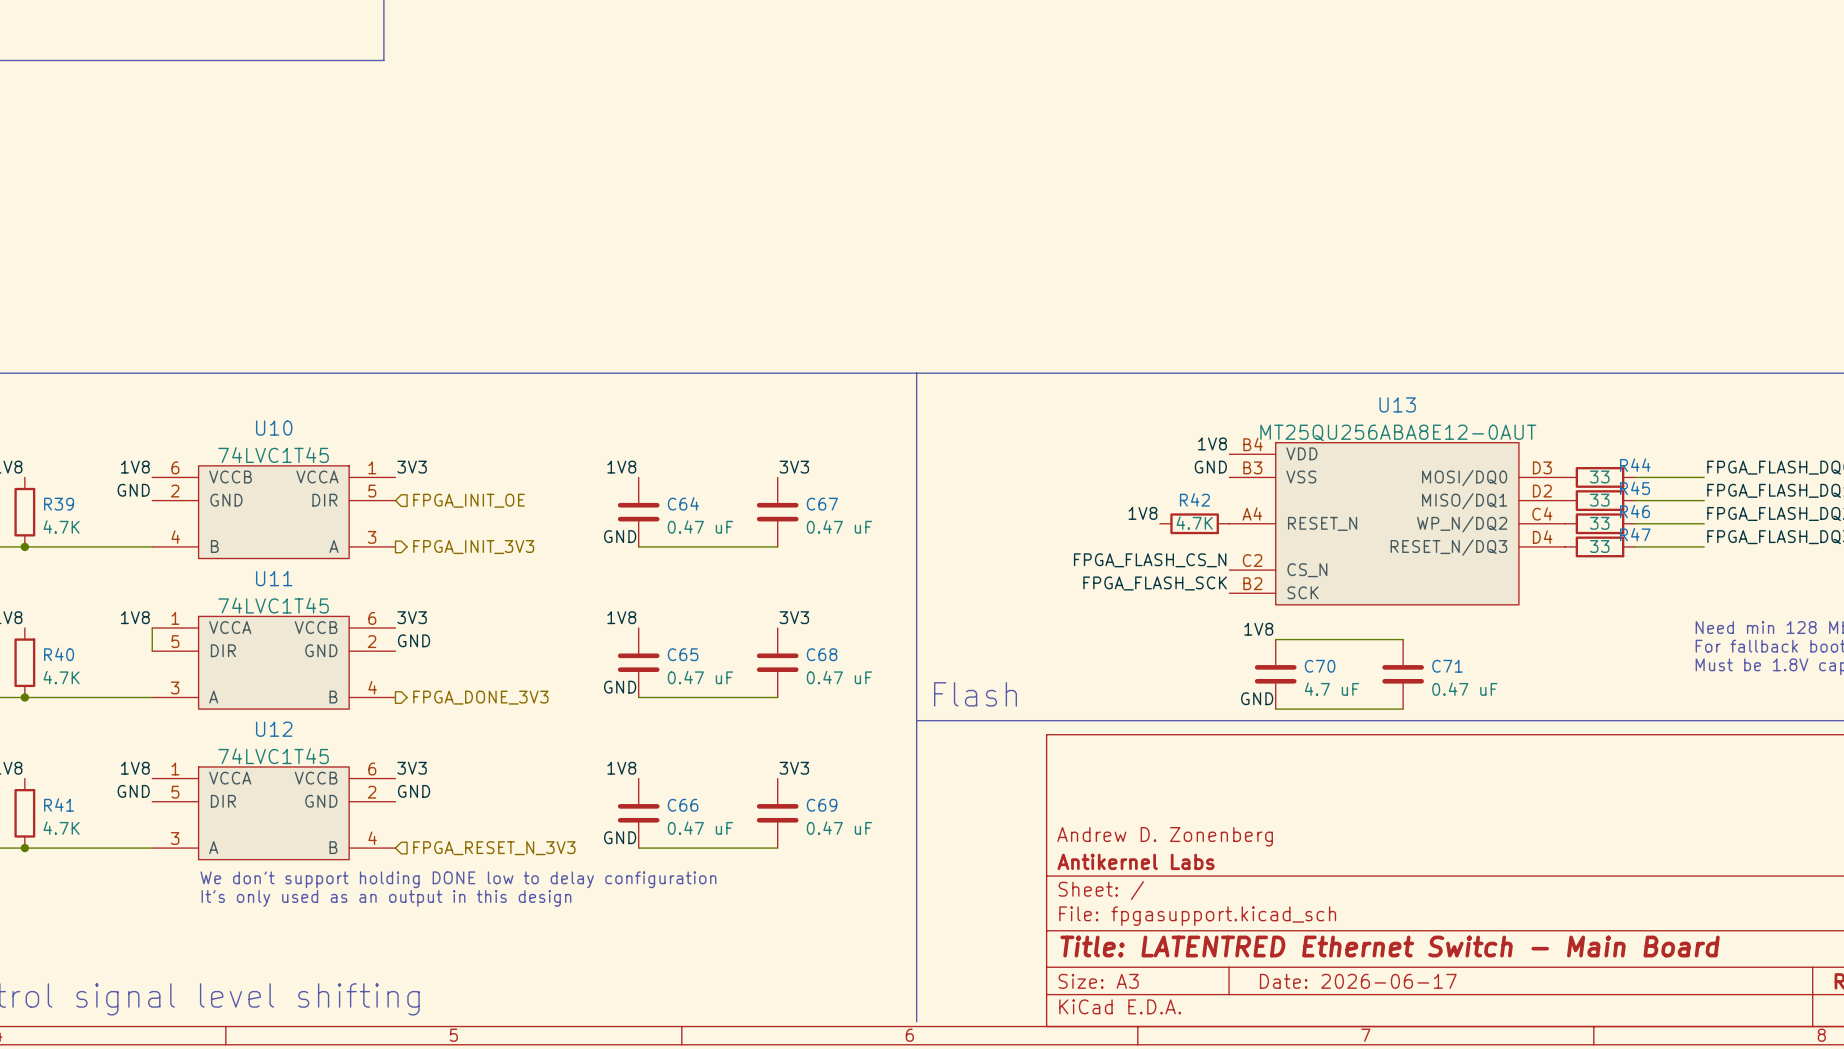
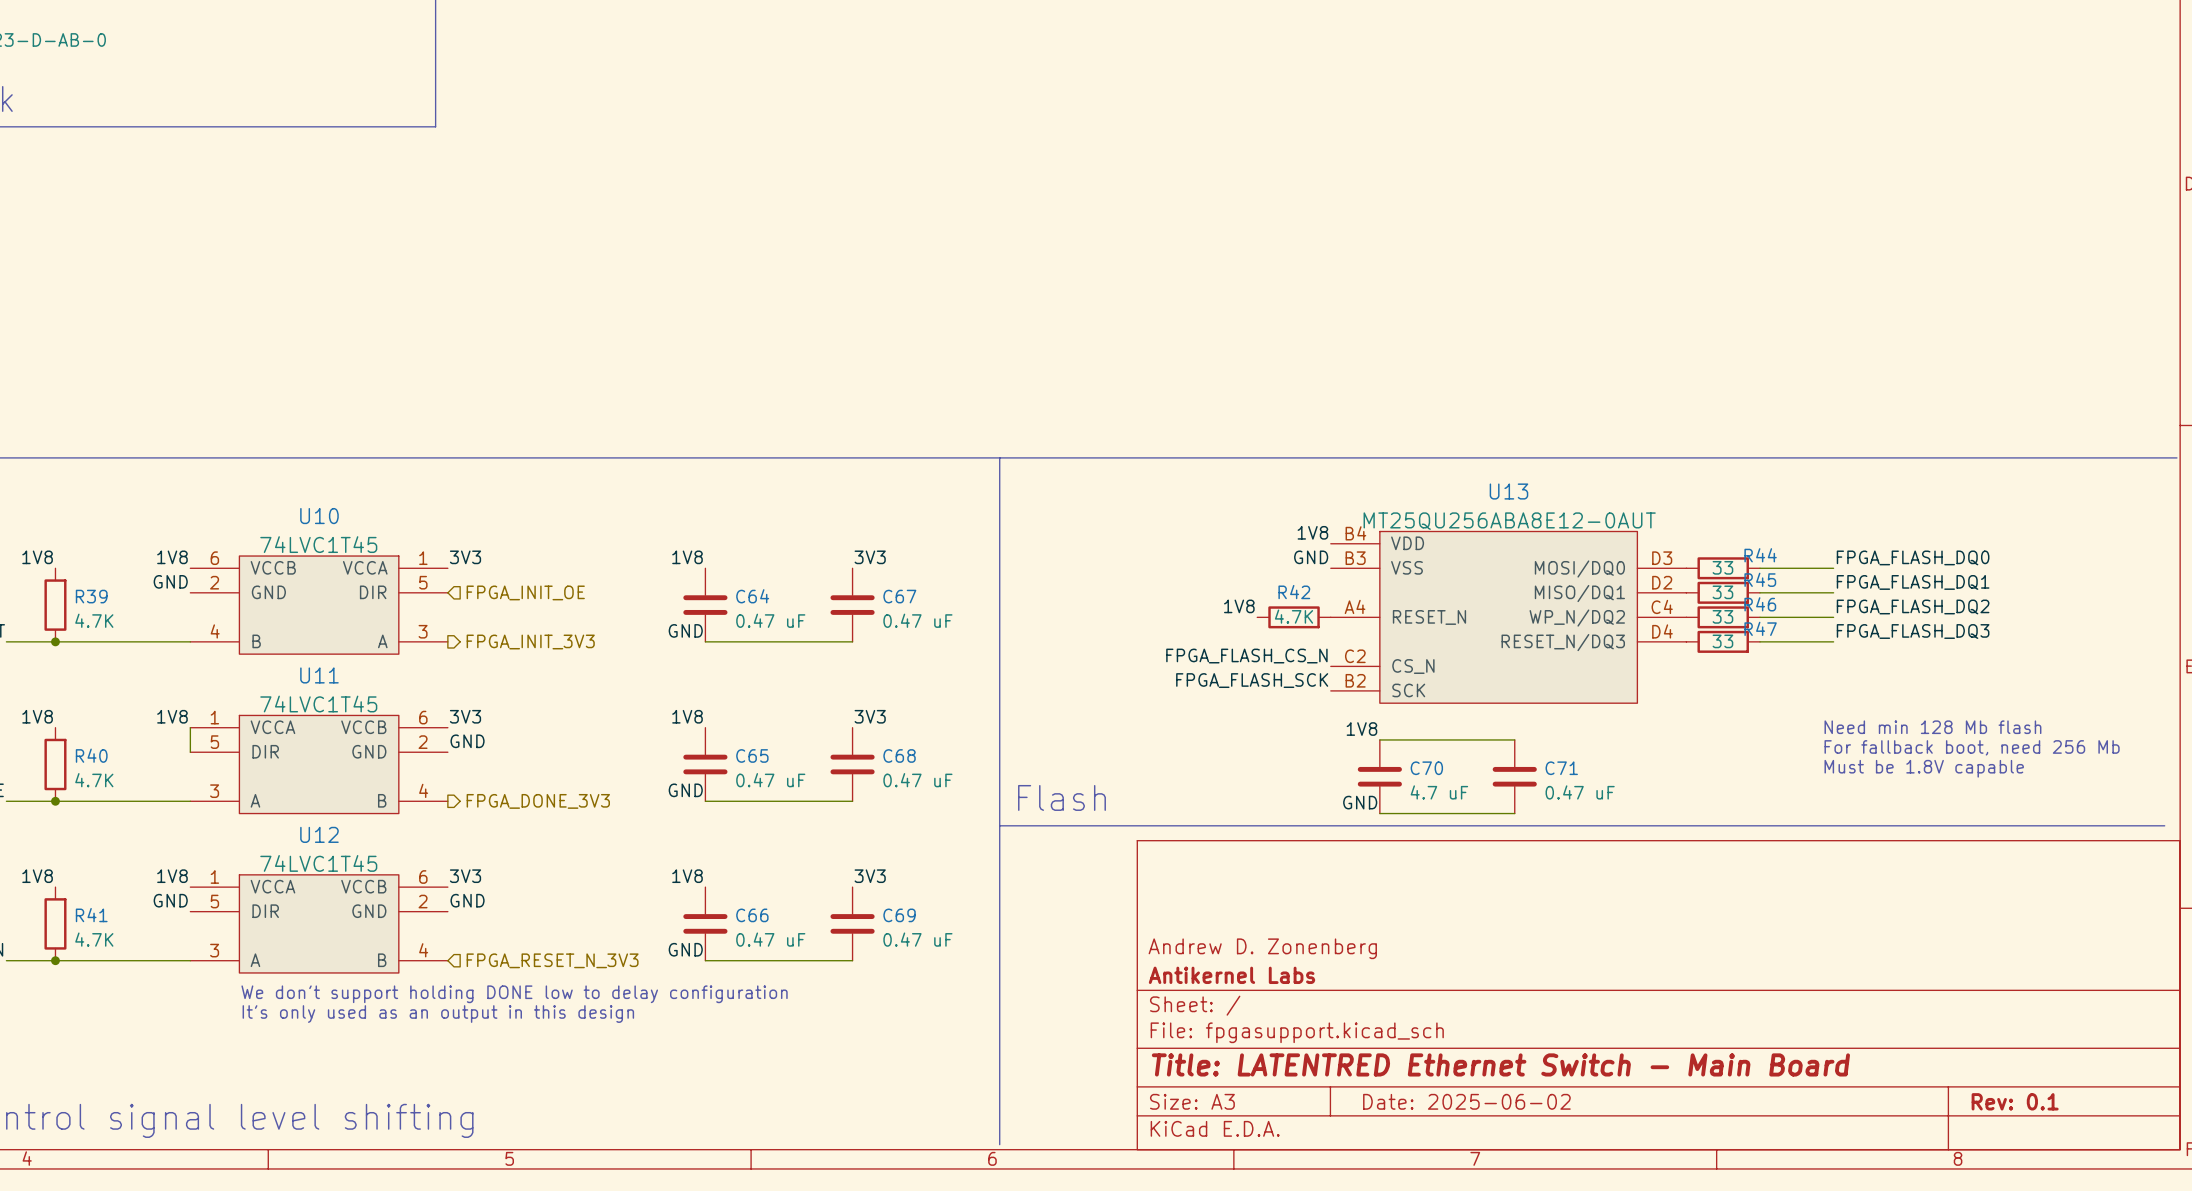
title block: Date: 2026-06-17 (1358, 981) -> Date: 2025-06-02 (1466, 1101)

